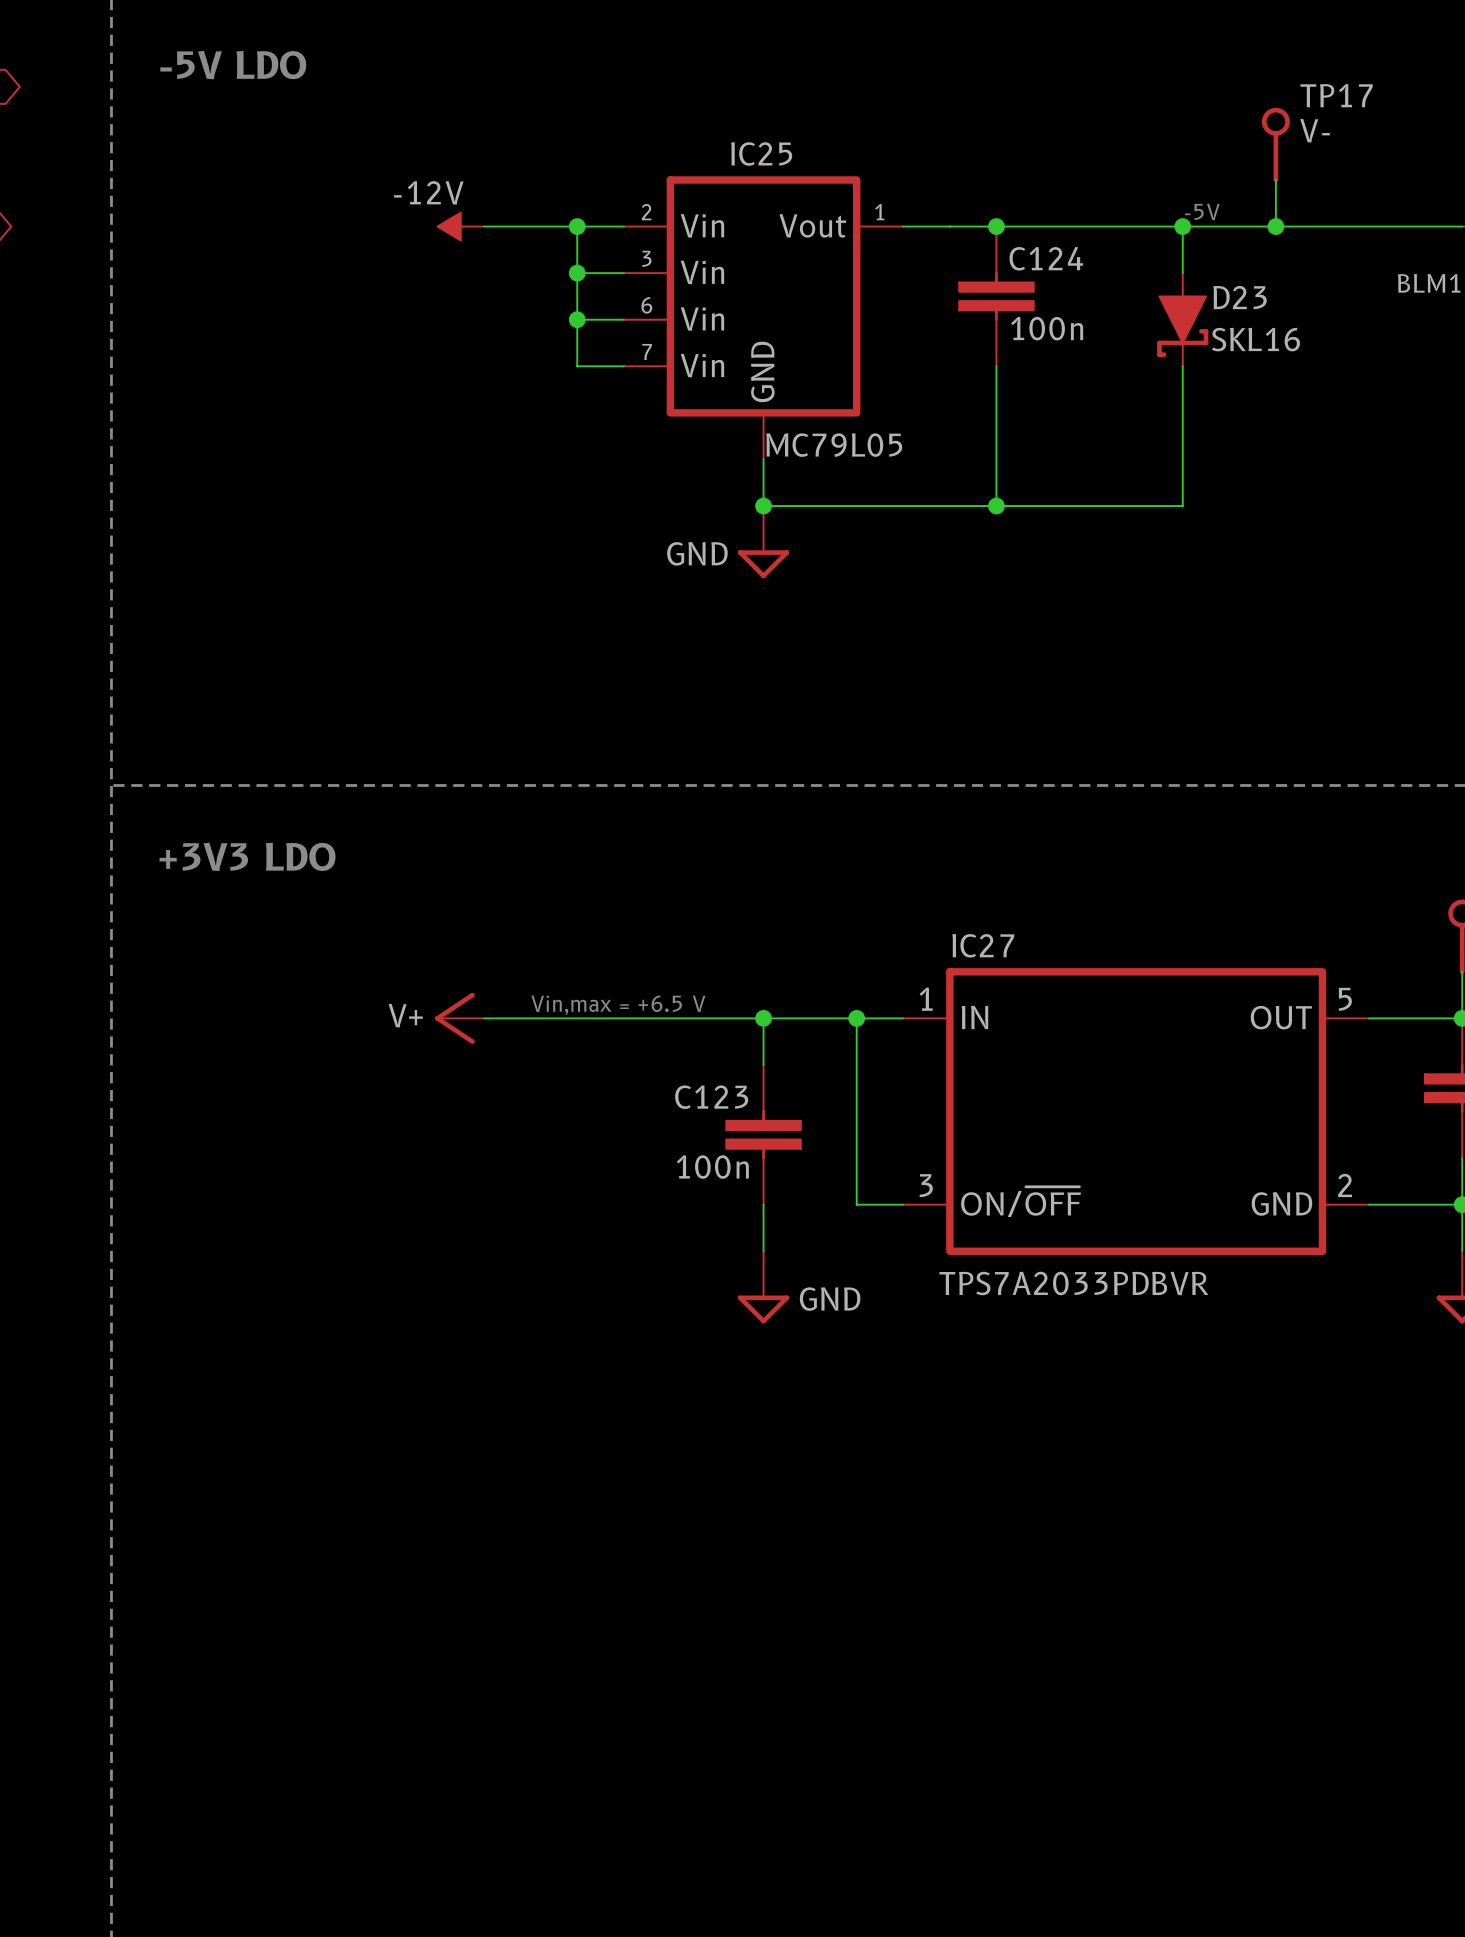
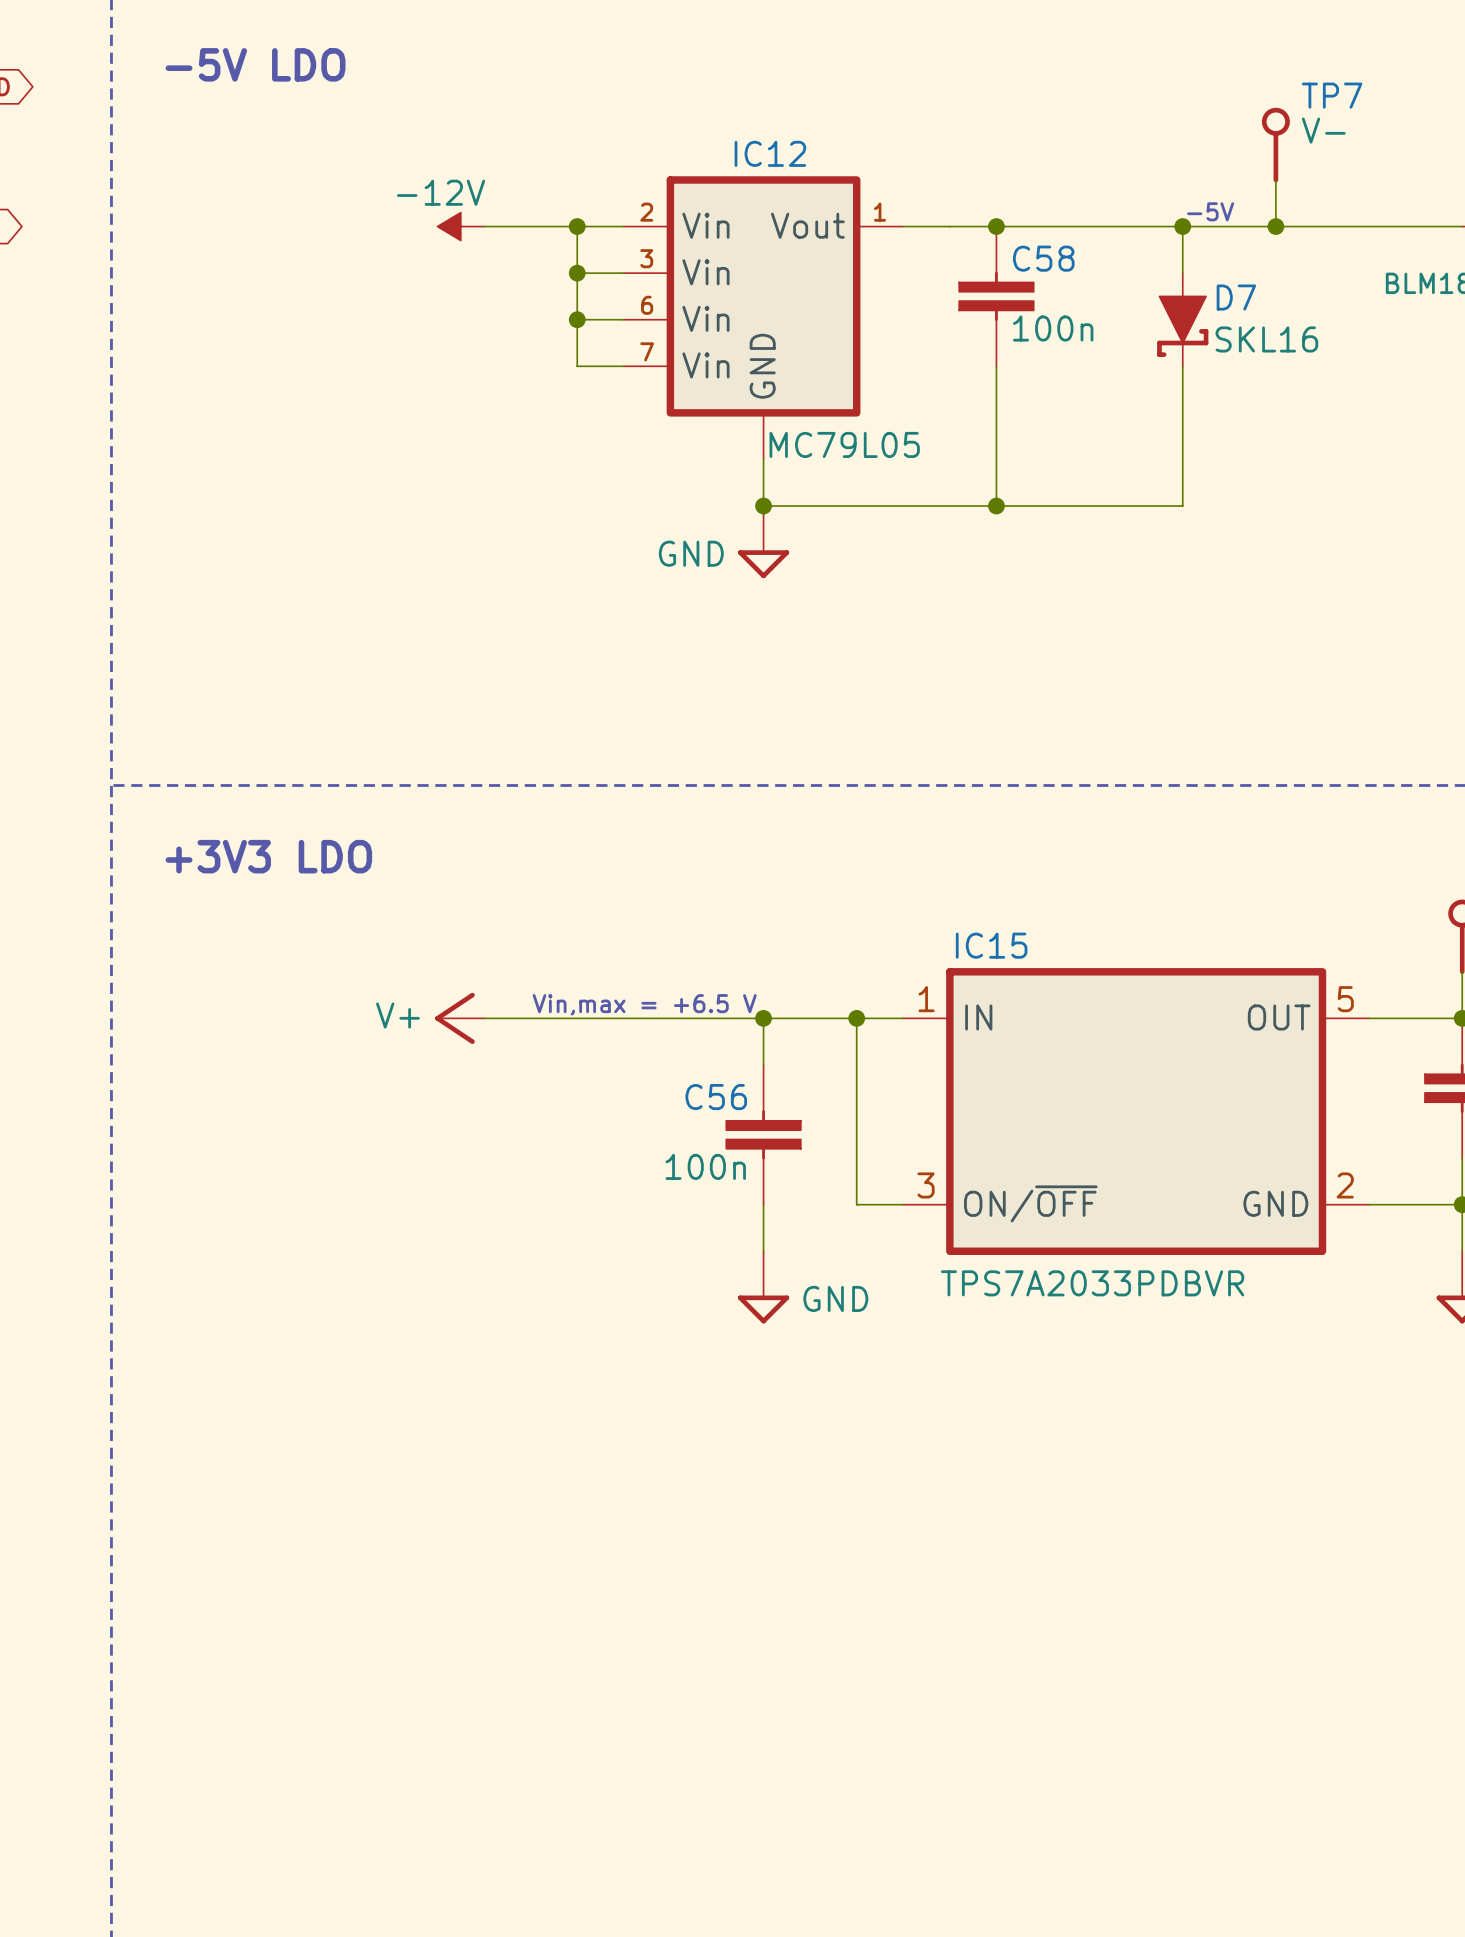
TP17 name: TP17 (1336, 95) -> TP7 (1332, 95)
IC25 name: IC25 (761, 153) -> IC12 (770, 153)
C124 name: C124 (1046, 258) -> C58 (1043, 258)
D23 name: D23 (1240, 297) -> D7 (1236, 297)
IC27 name: IC27 (983, 945) -> IC15 (991, 945)
C123 name: C123 (711, 1097) -> C56 (716, 1097)

